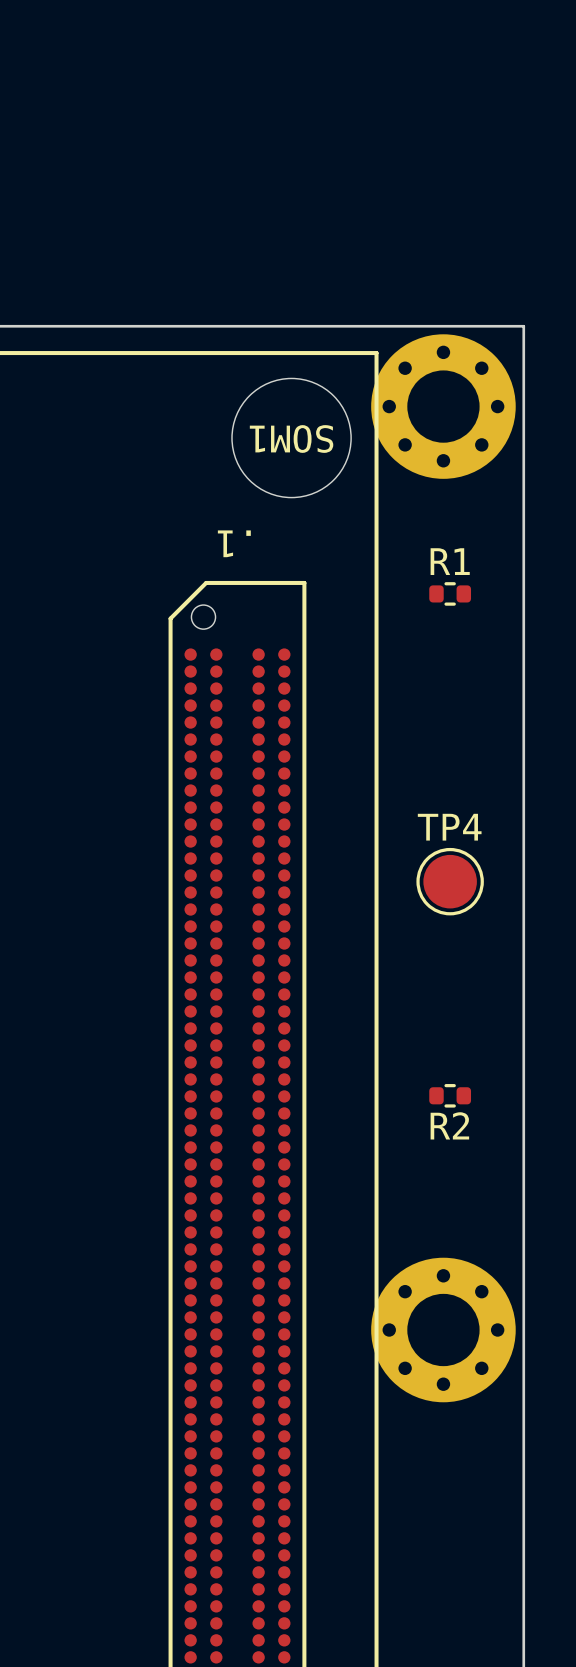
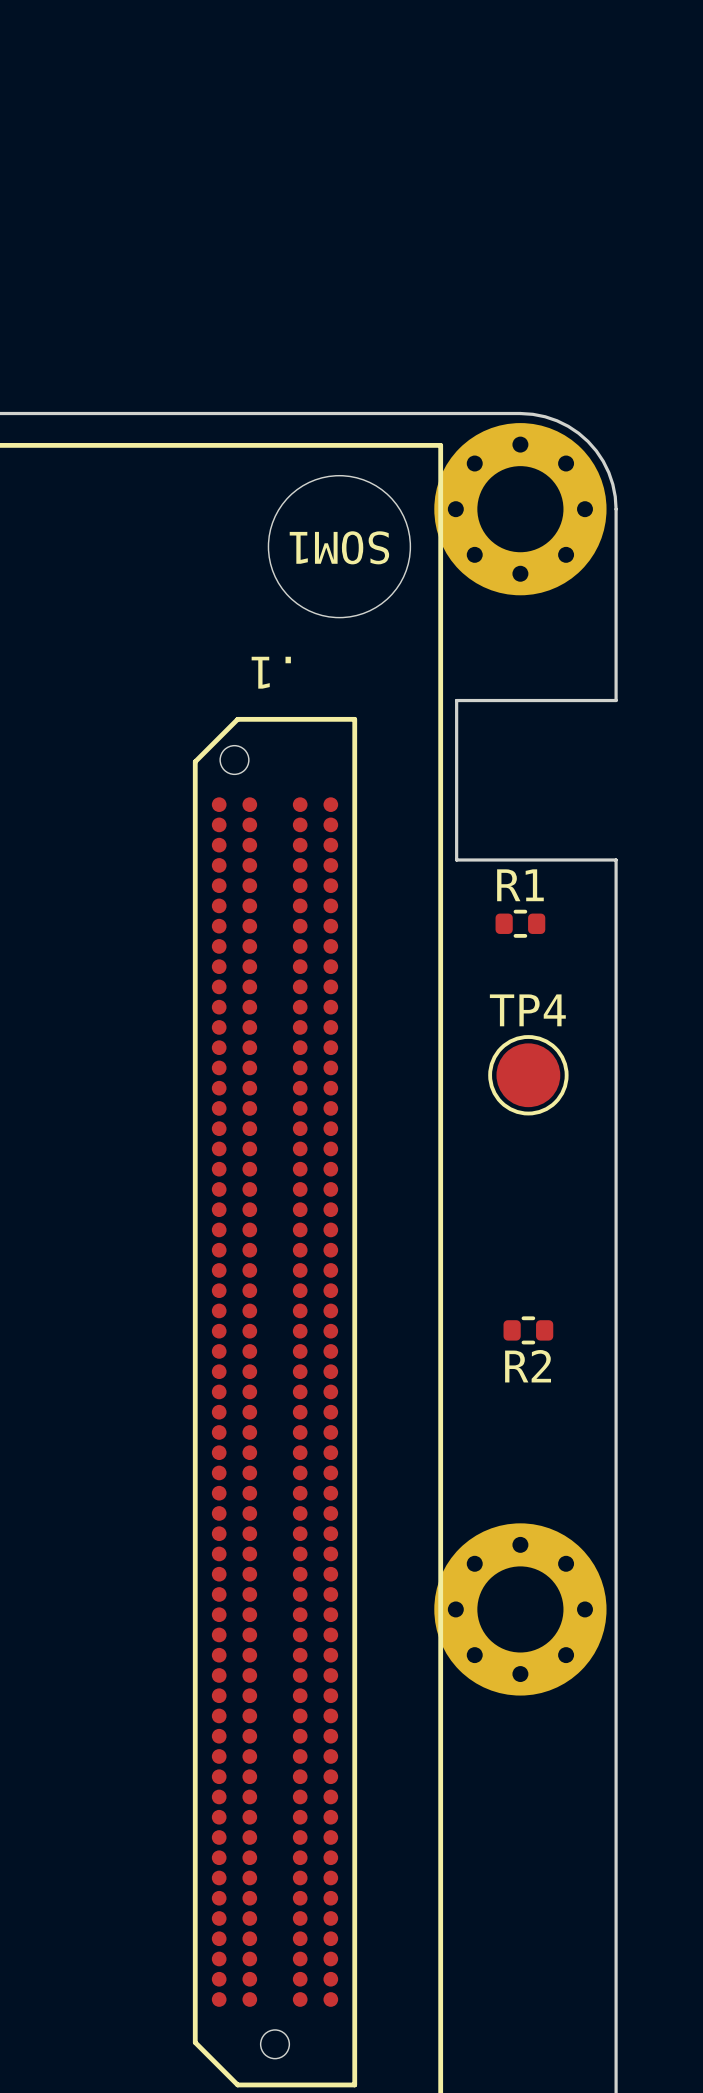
board edge: (443, 326) (523, 326) (523, 406) -> (520, 413) (532, 414) (557, 420) (578, 433) (588, 441) (603, 461) (608, 472) (615, 496) (616, 509)
board edge: (523, 567) (523, 701) -> (616, 700) (456, 700) (456, 859) (616, 859)
R1 position: (450, 593) -> (520, 923)

